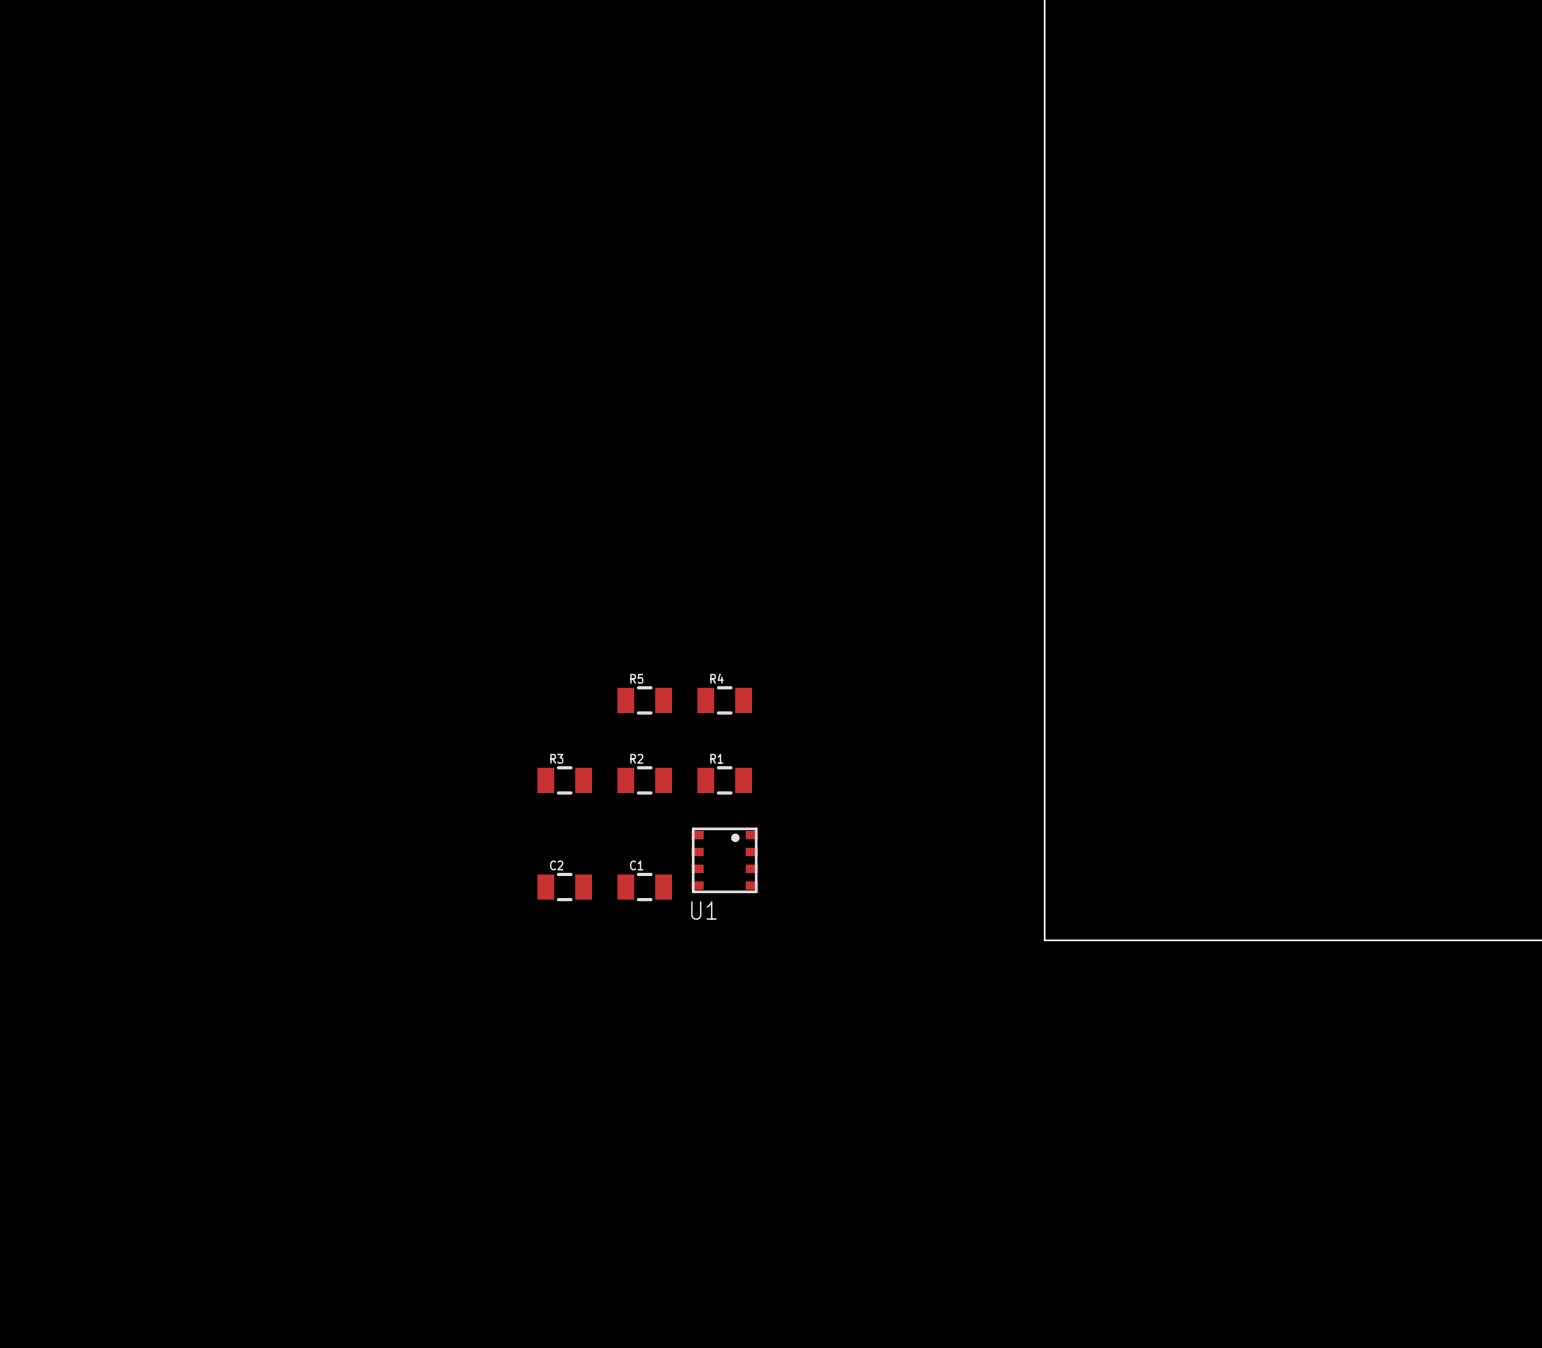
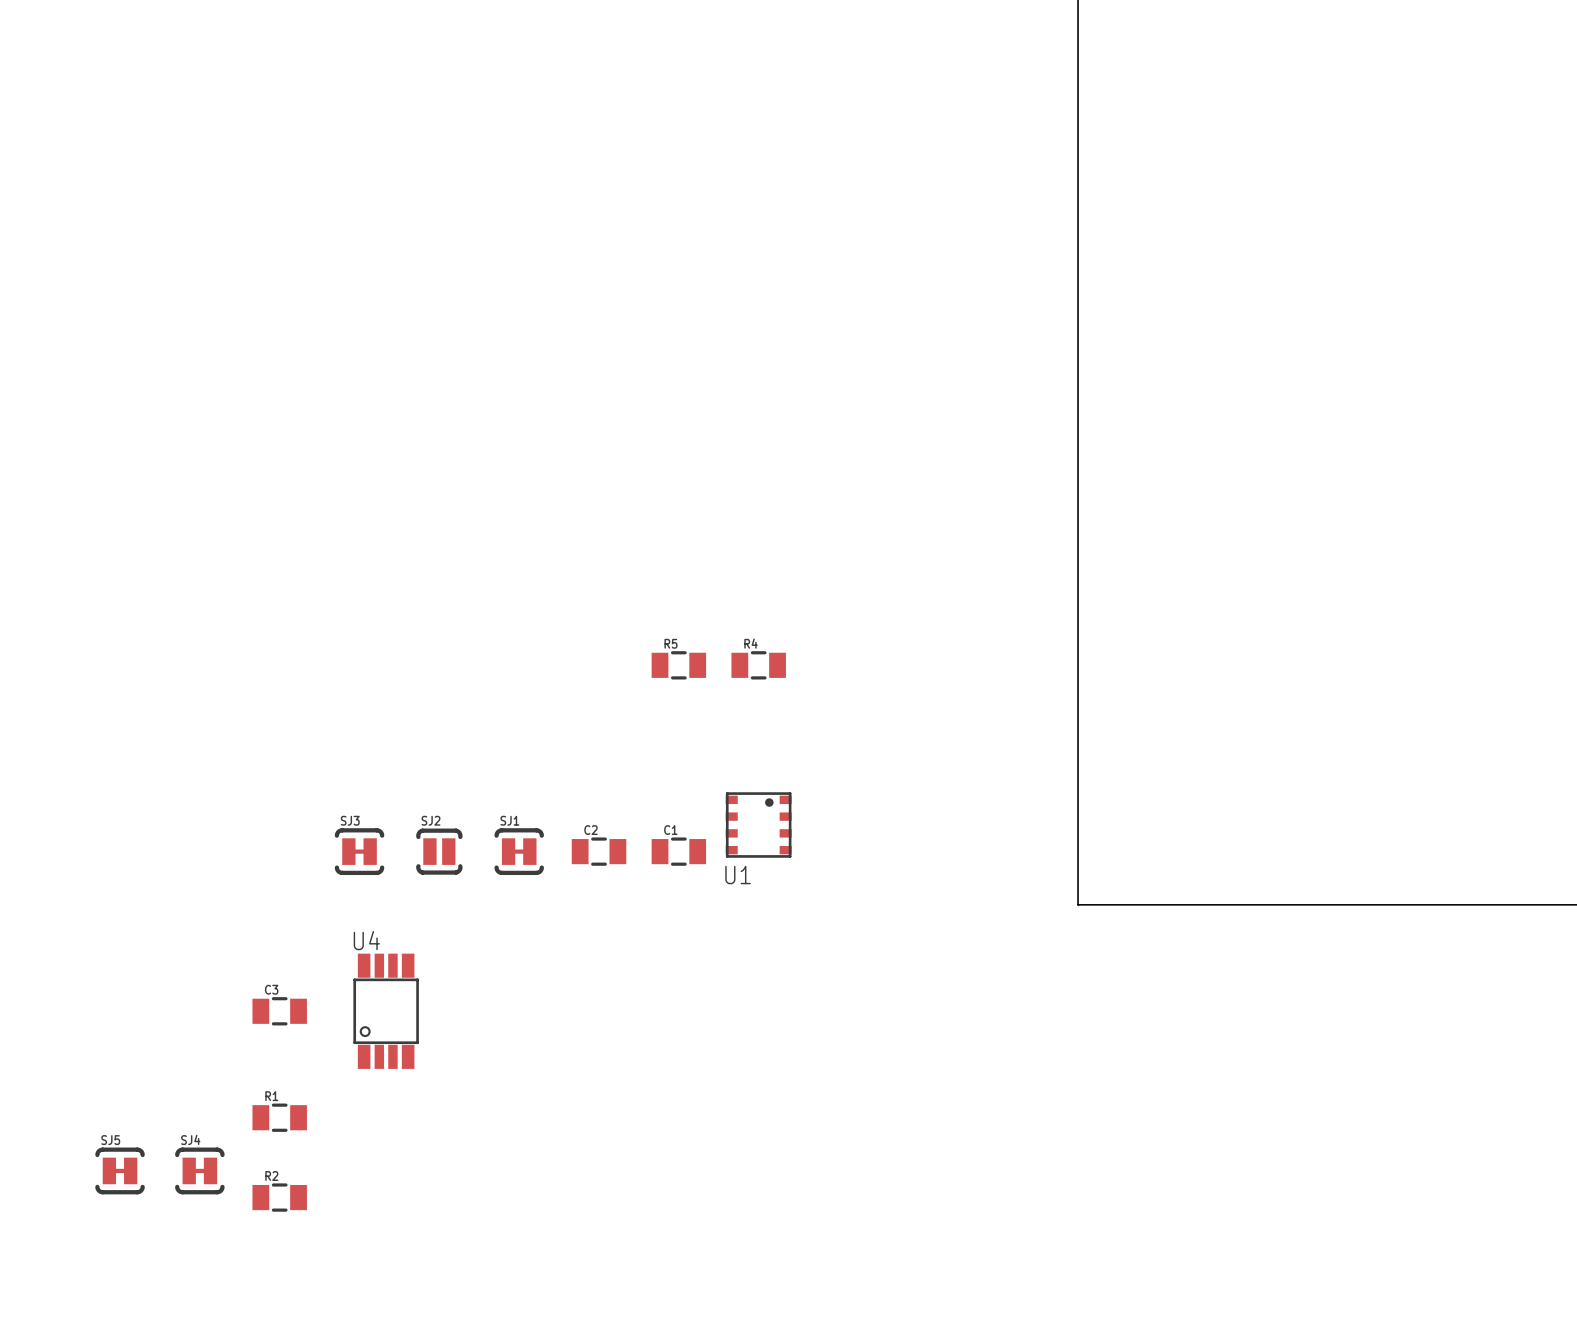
R3: (564, 780) -> none
R2 position: (644, 780) -> (279, 1197)
R1 position: (724, 780) -> (279, 1117)
SJ3: none -> (359, 851)
SJ2: none -> (439, 851)
SJ1: none -> (519, 851)
C3: none -> (279, 1011)
U4: none -> (386, 1011)
SJ5: none -> (120, 1170)
SJ4: none -> (199, 1170)

